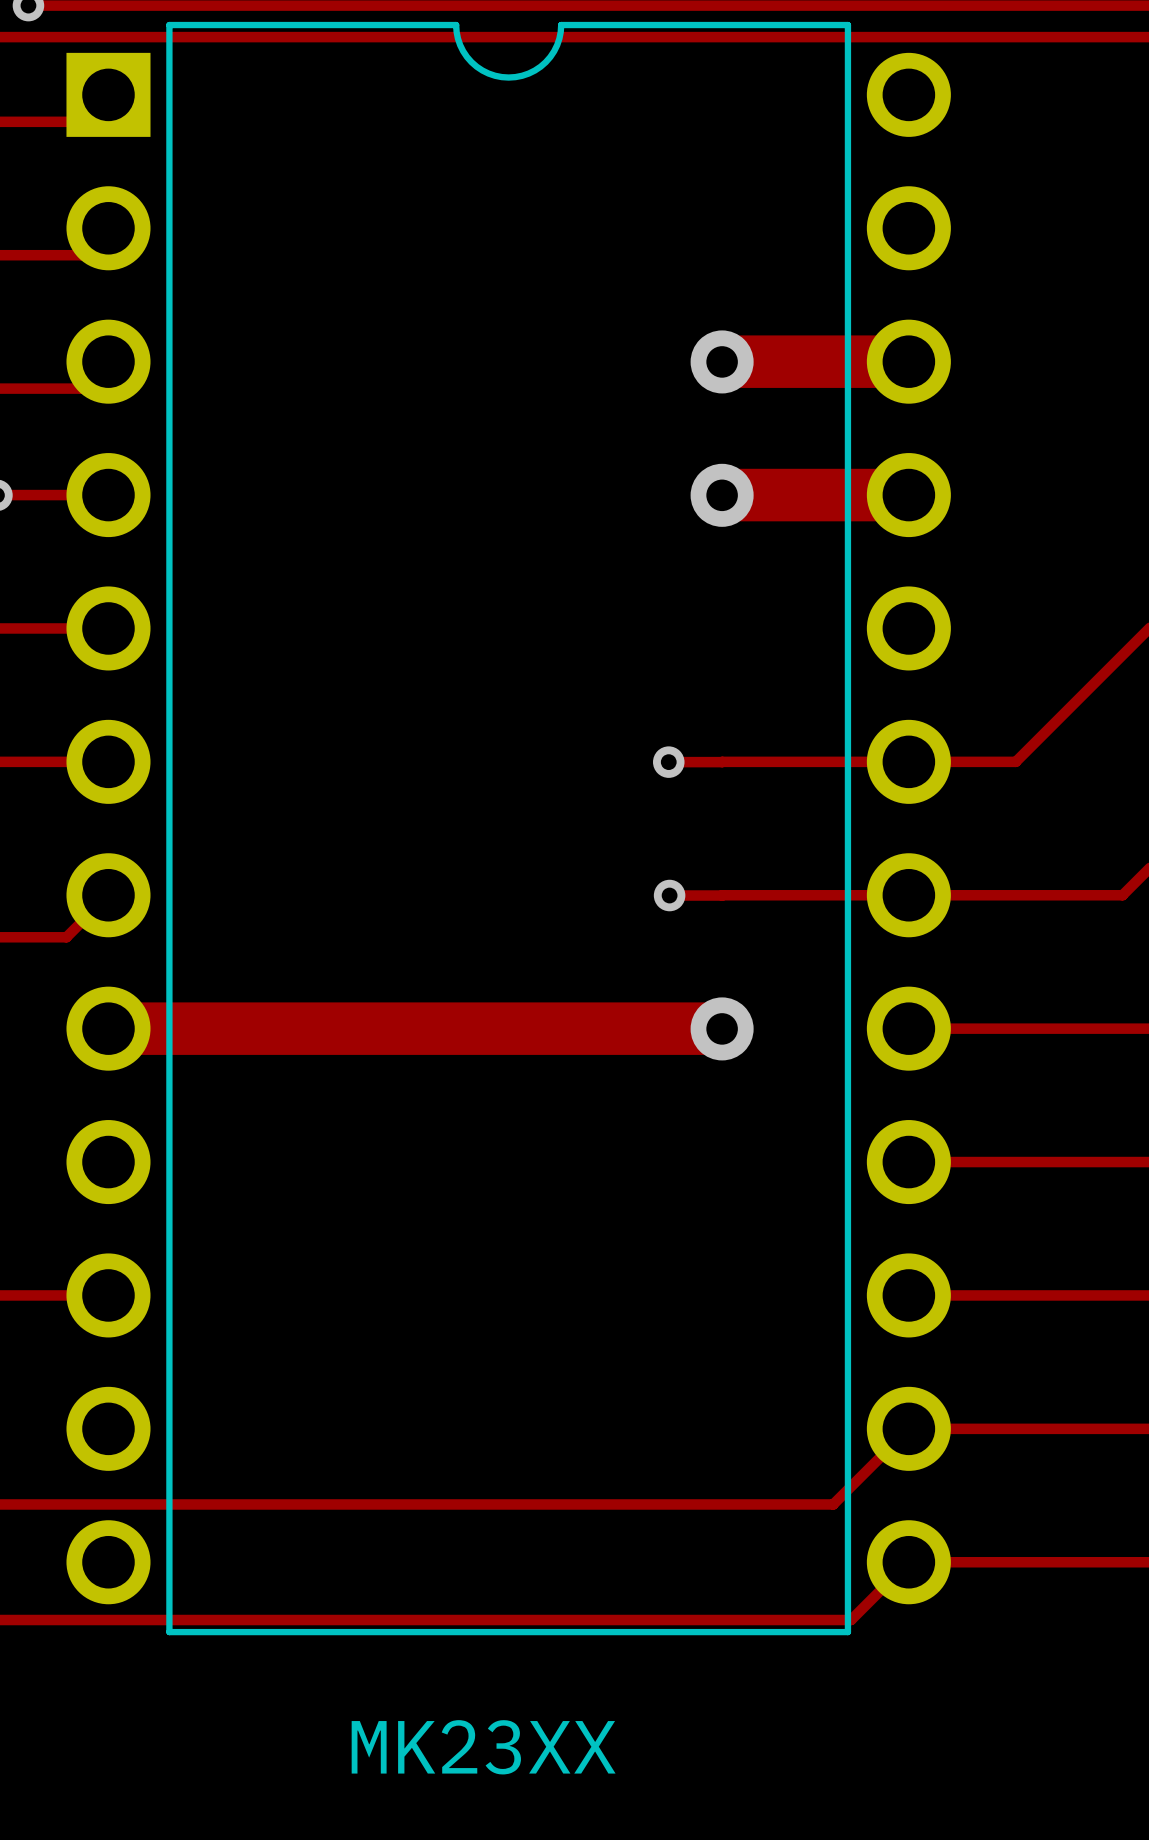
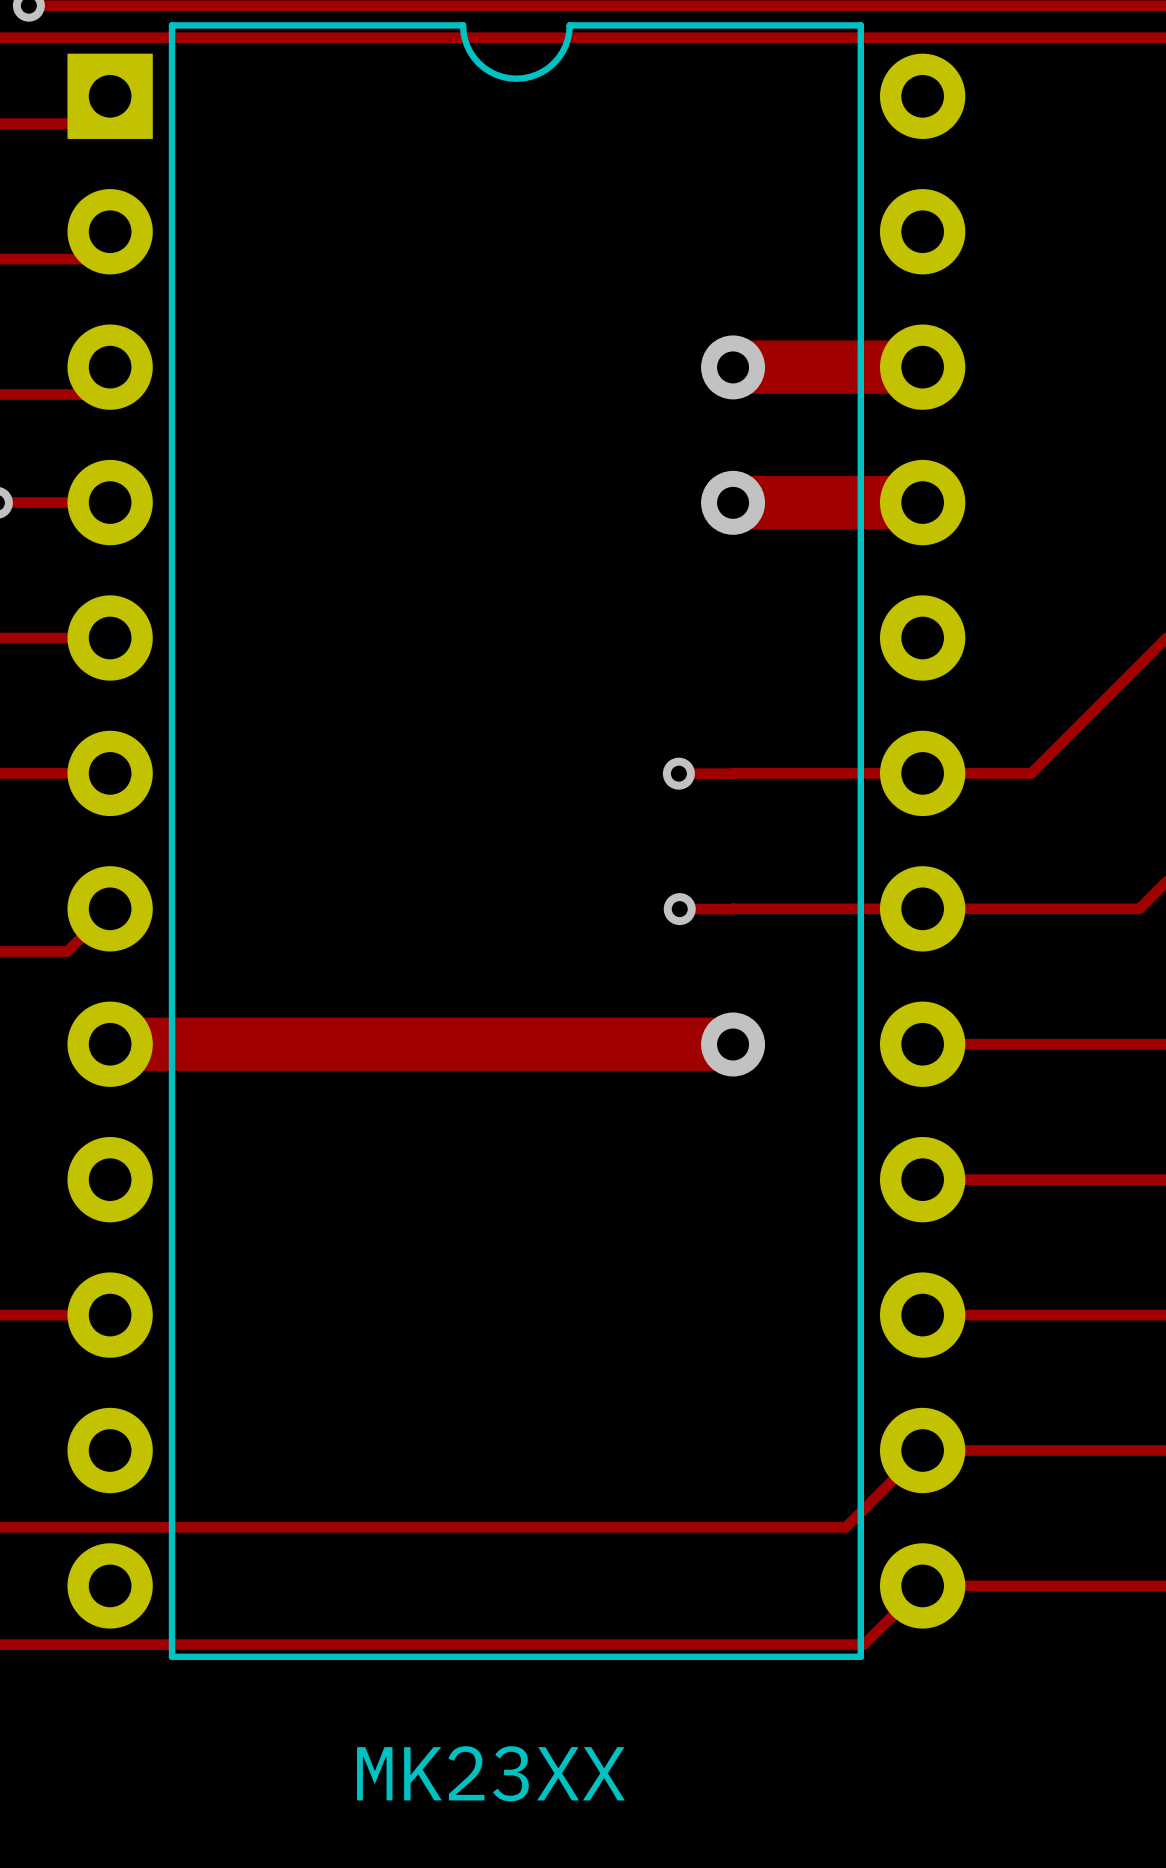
part footprint: [66, 21, 951, 1636] -> [67, 22, 966, 1661]

